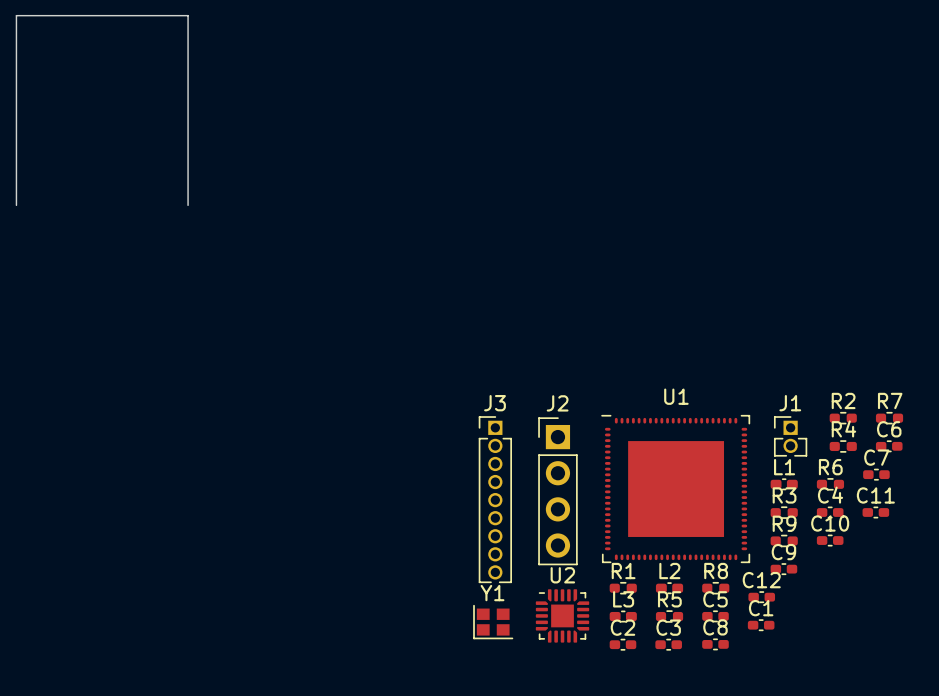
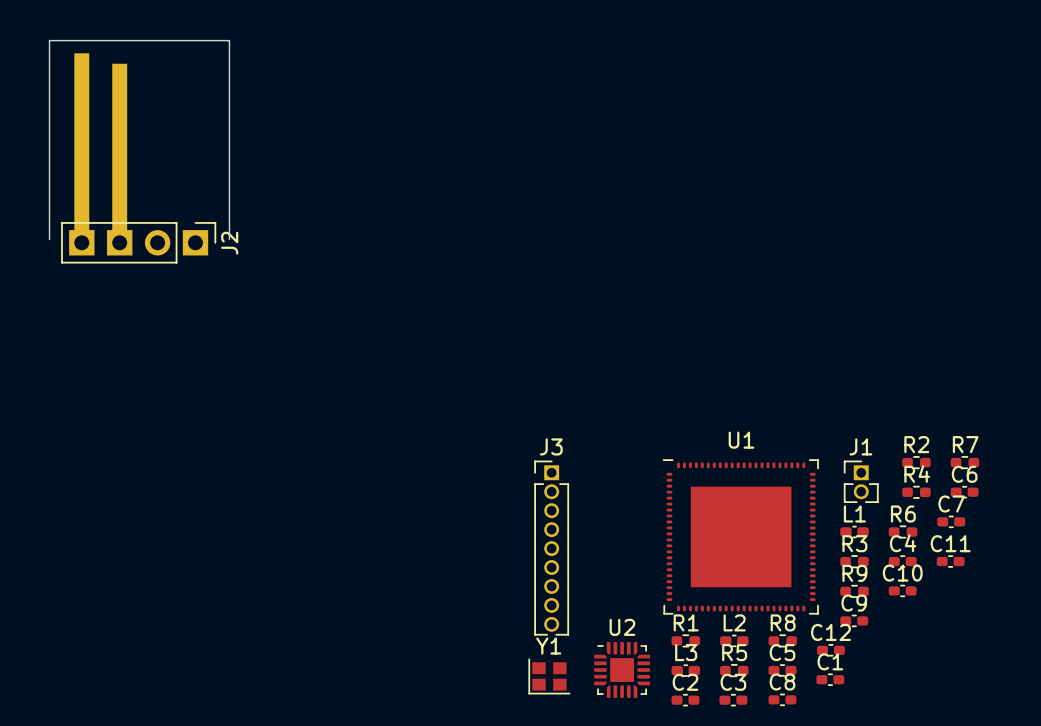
J2 name position: J2 (557, 403) -> J2 (229, 243)
J2 footprint: [538, 417, 578, 566] -> [61, 53, 217, 264]

